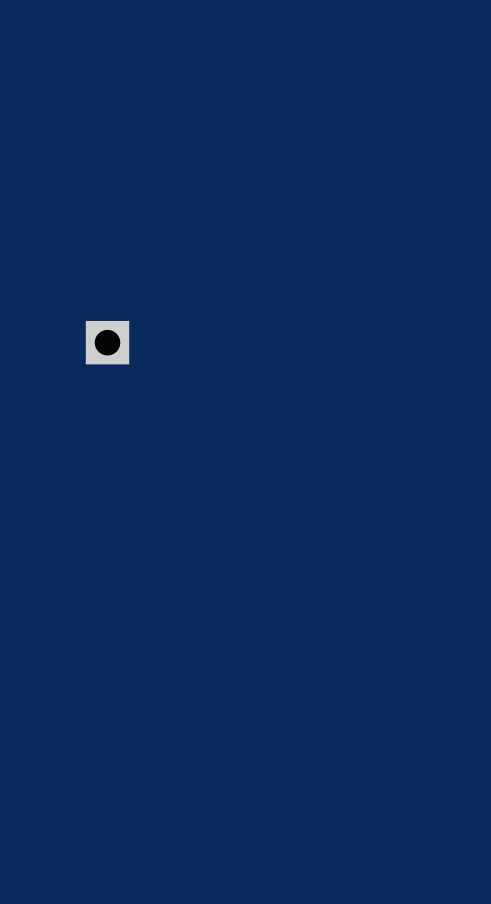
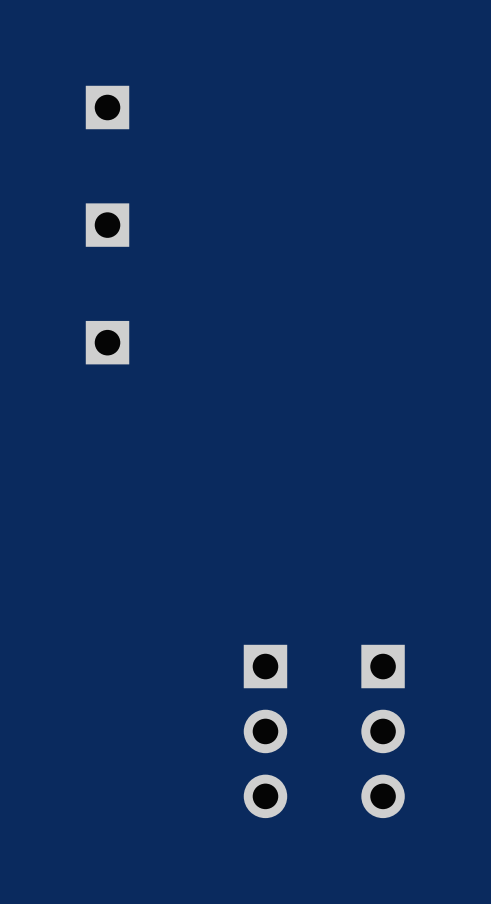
part: none -> (107, 107)
part: none -> (107, 225)
part: none -> (265, 731)
part: none -> (383, 731)

